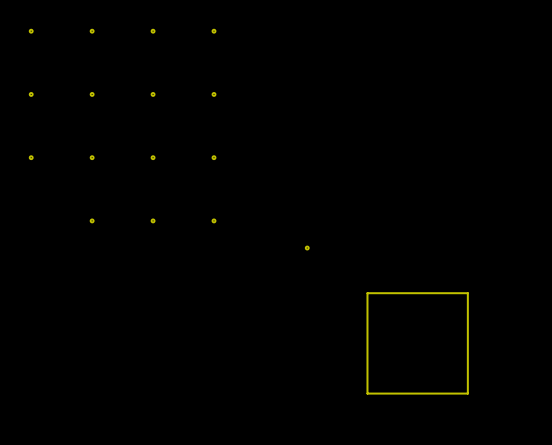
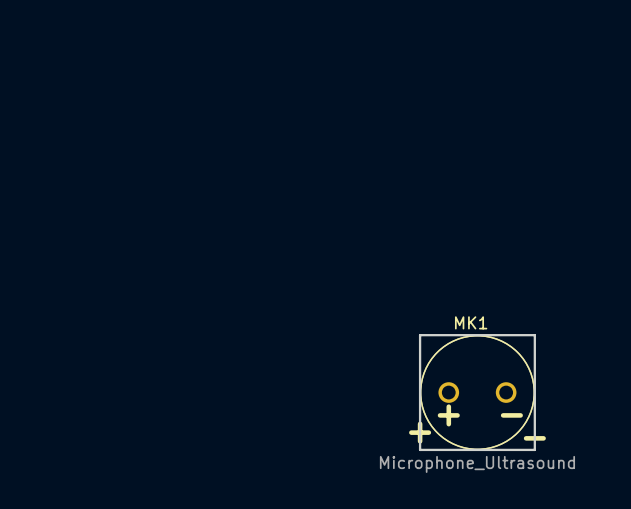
part: (31, 31) -> none
part: (92, 31) -> none
part: (153, 31) -> none
part: (214, 31) -> none
part: (31, 94) -> none
part: (92, 94) -> none
part: (153, 94) -> none
part: (214, 94) -> none
part: (31, 157) -> none
part: (92, 157) -> none
part: (153, 157) -> none
part: (214, 157) -> none
part: (92, 220) -> none
part: (153, 220) -> none
part: (214, 220) -> none
part: (307, 248) -> none
MK1: none -> Microphone_Ultrasound (477, 392)

